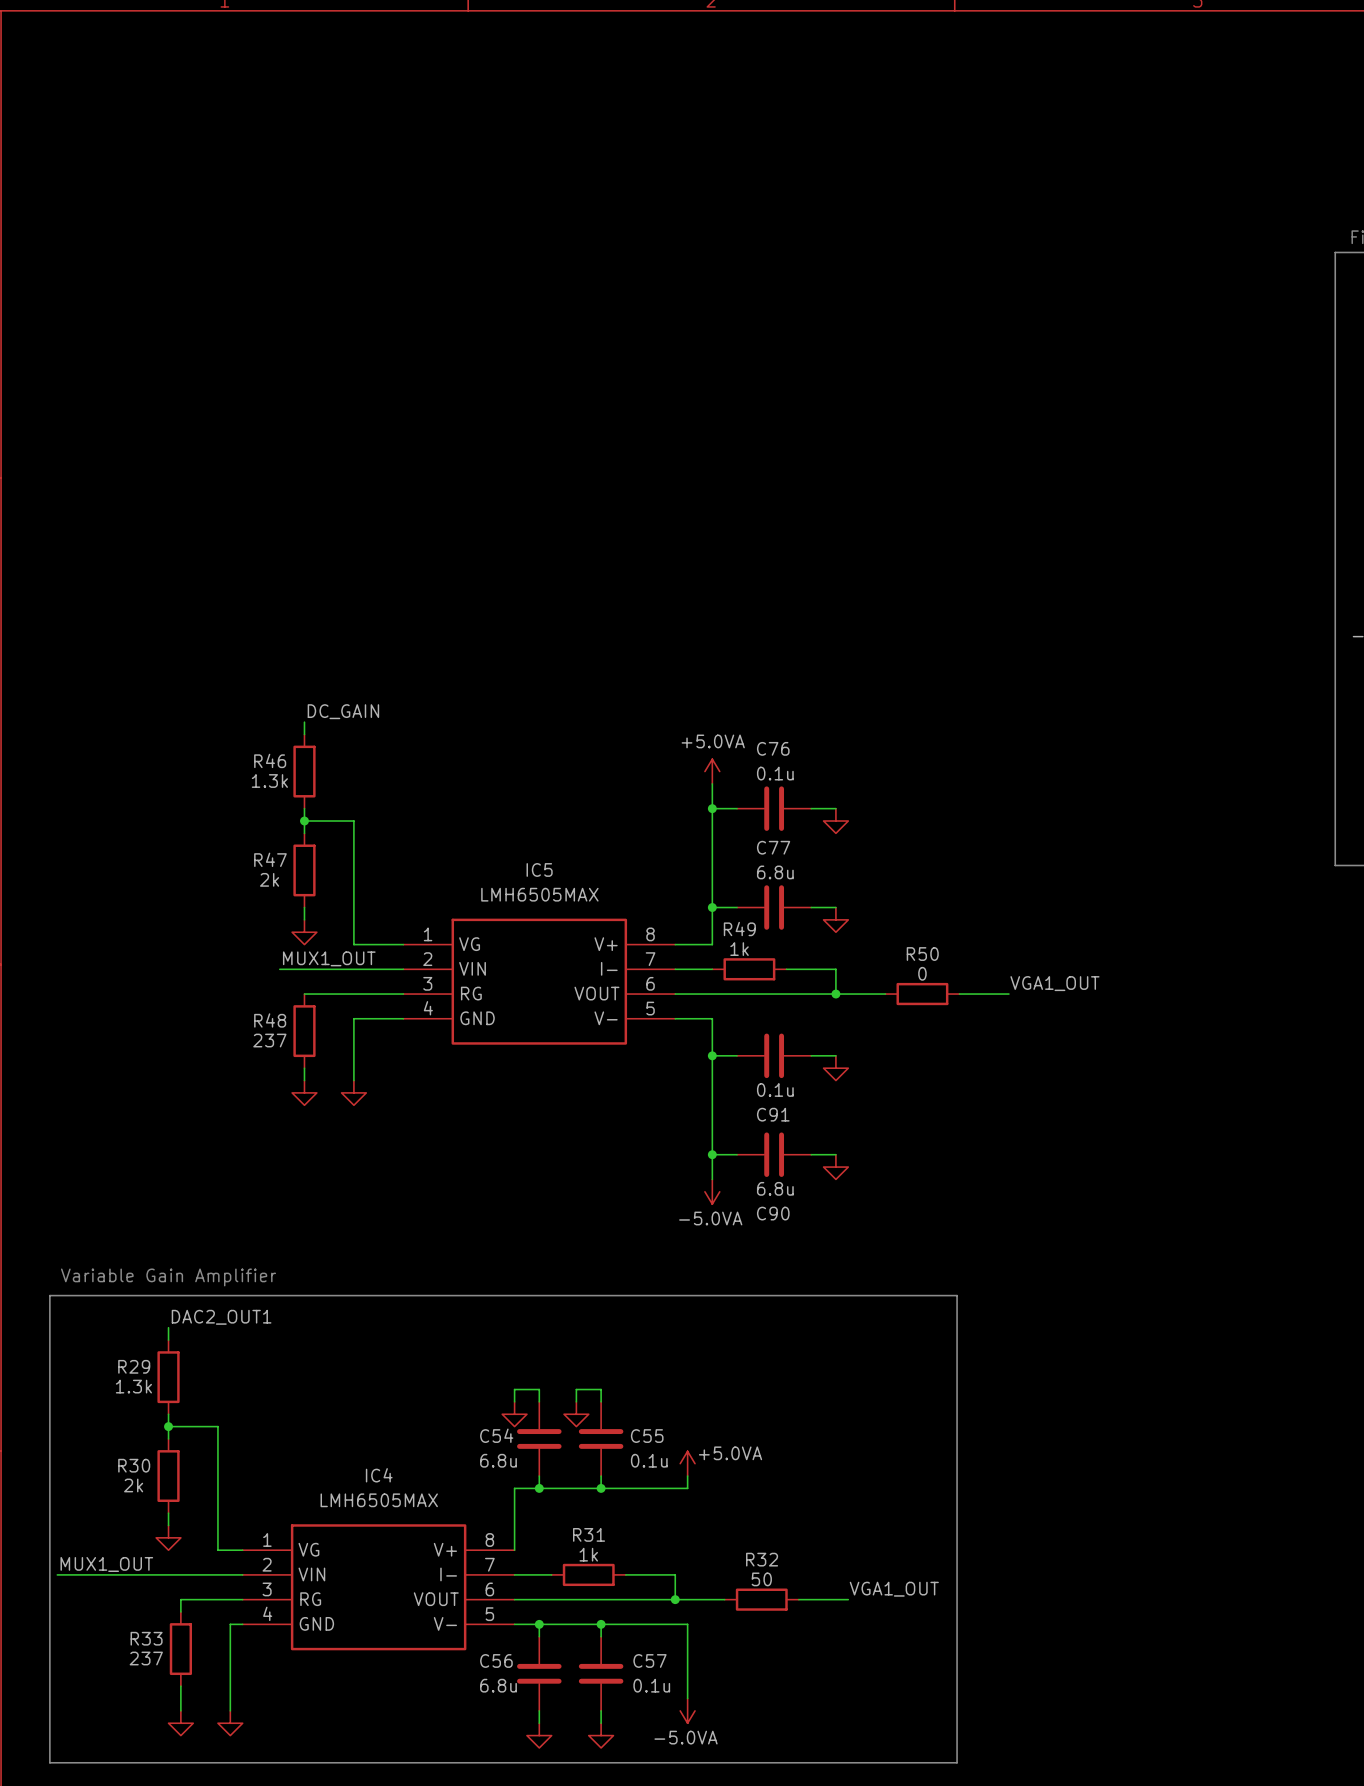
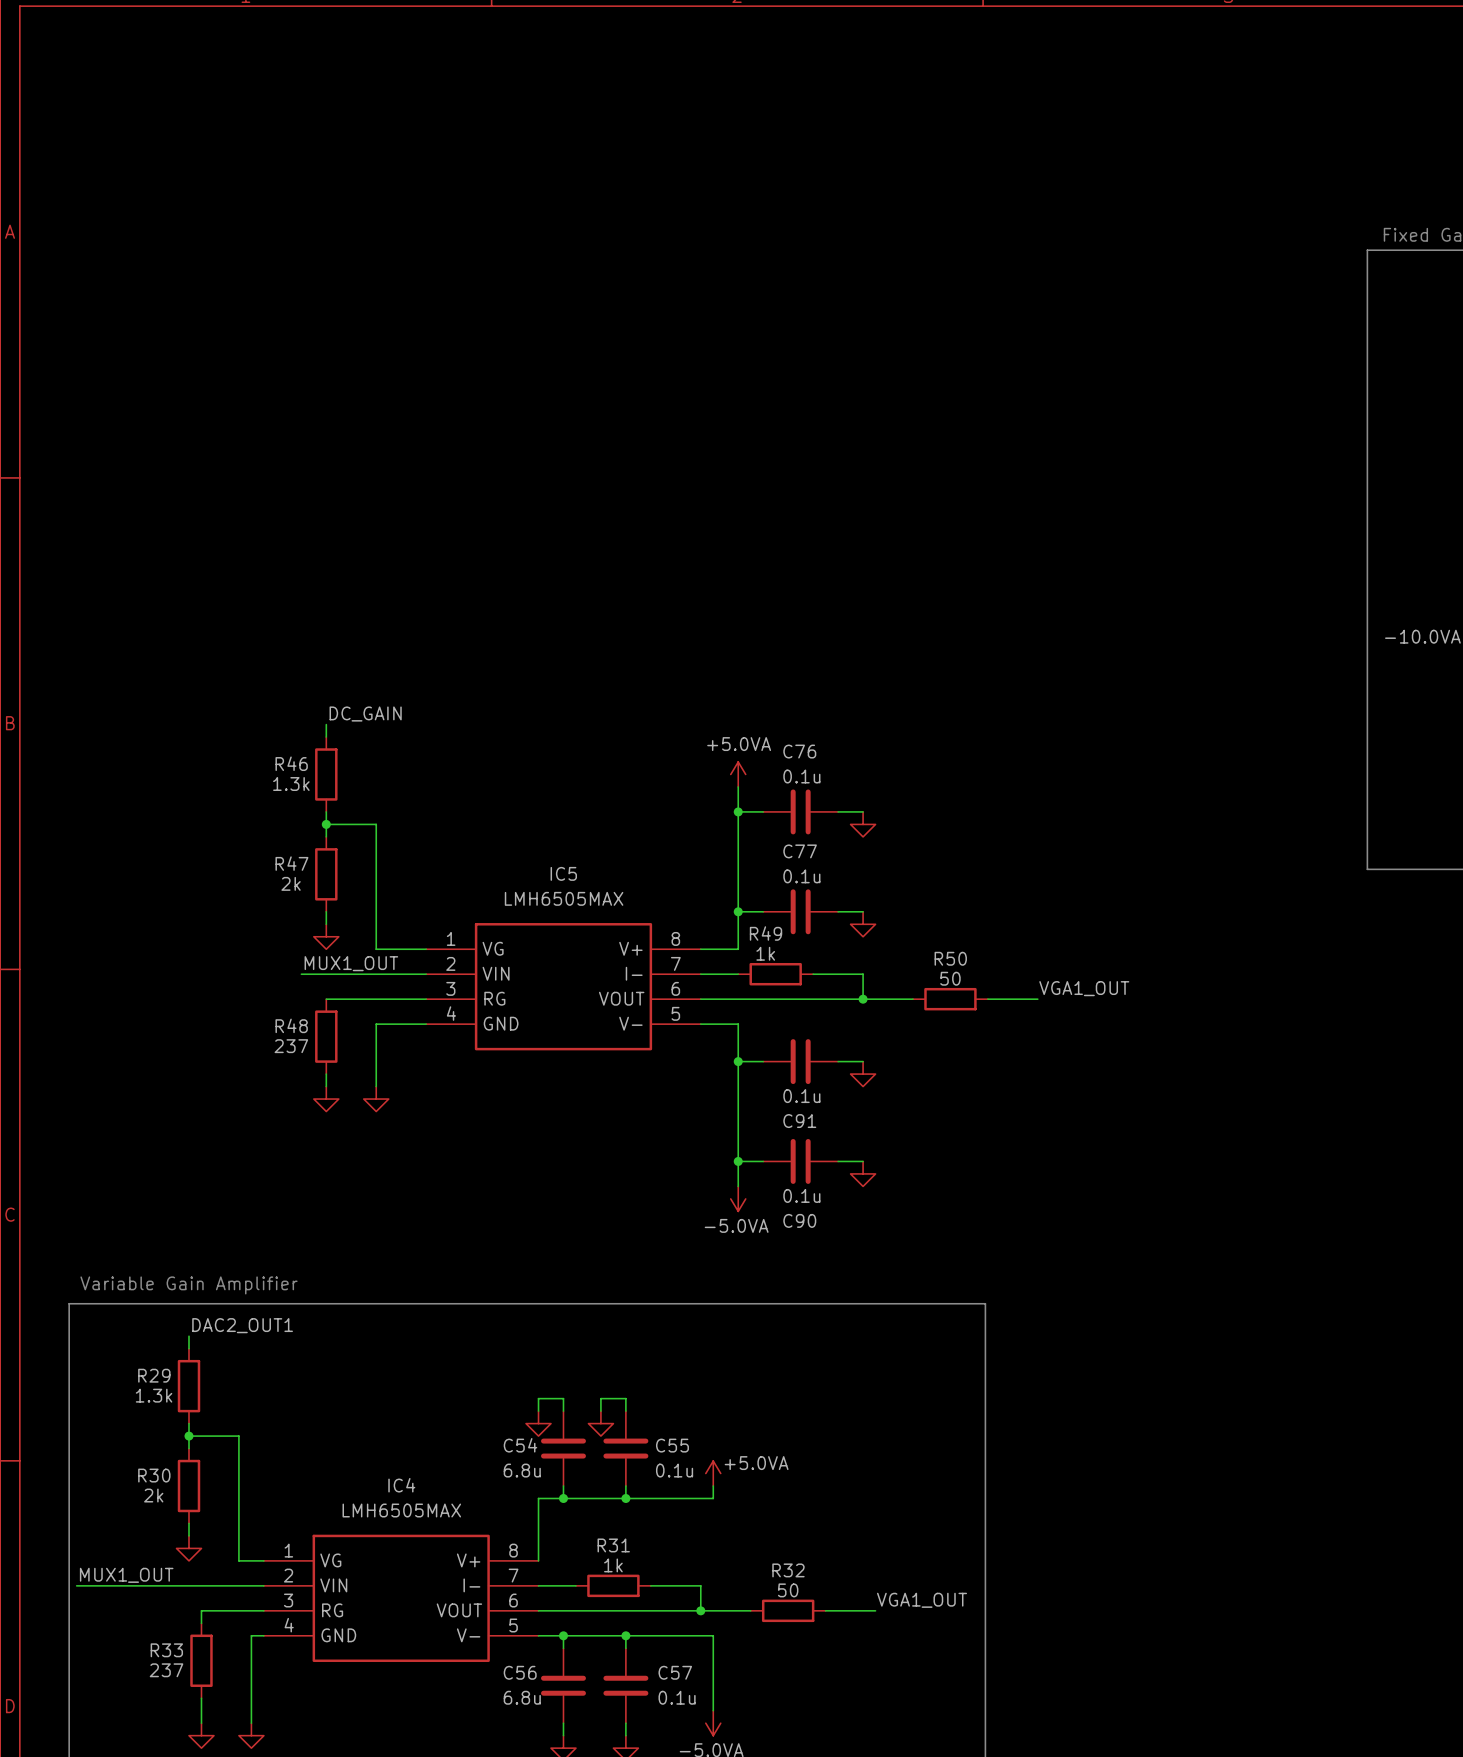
C77 value: 6.8u (775, 872) -> 0.1u (801, 876)
R50 value: 0 (922, 973) -> 50 (950, 978)
C90 value: 6.8u (775, 1188) -> 0.1u (801, 1195)

